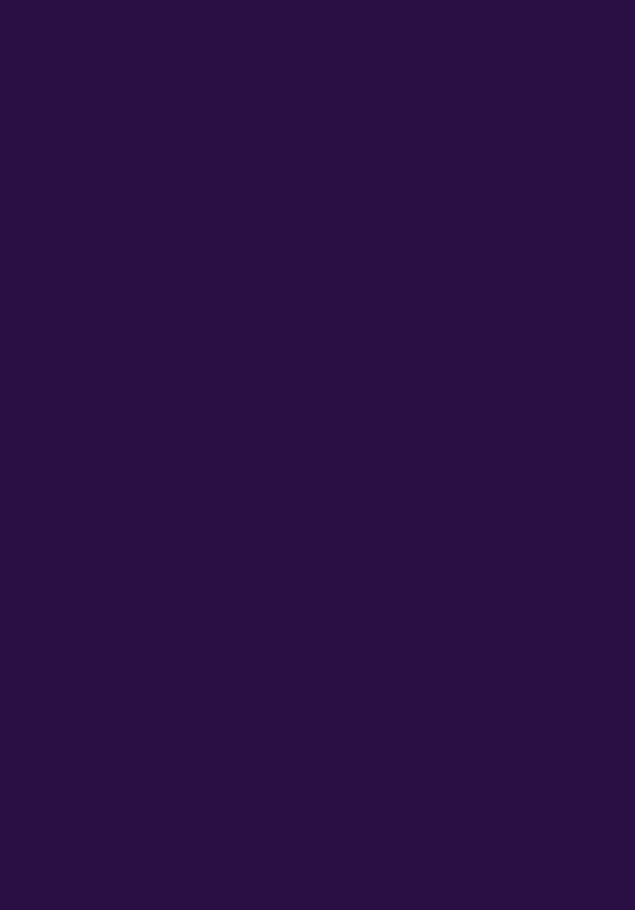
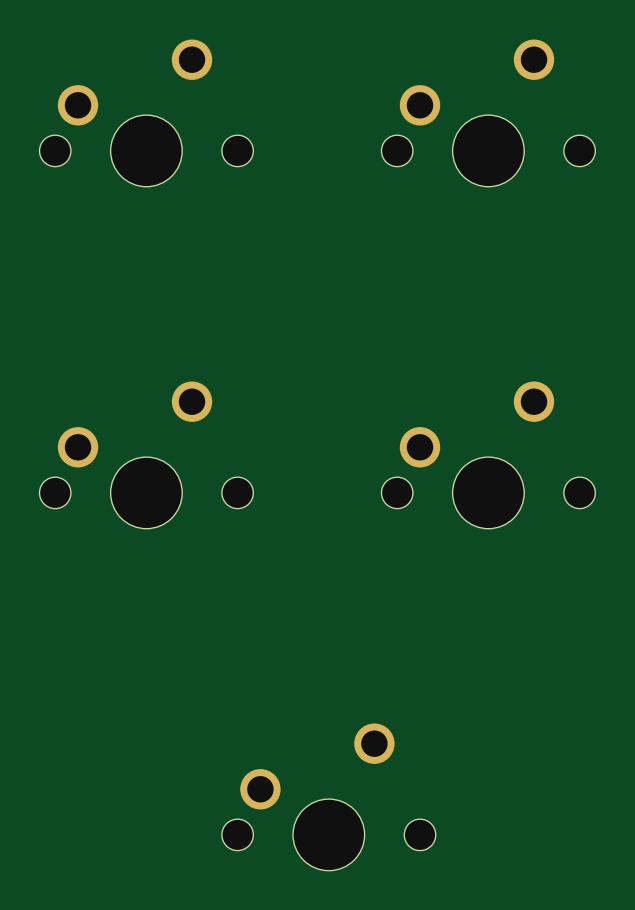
part: none -> (146, 113)
part: none -> (488, 113)
part: none -> (146, 455)
part: none -> (488, 455)
part: none -> (328, 797)

